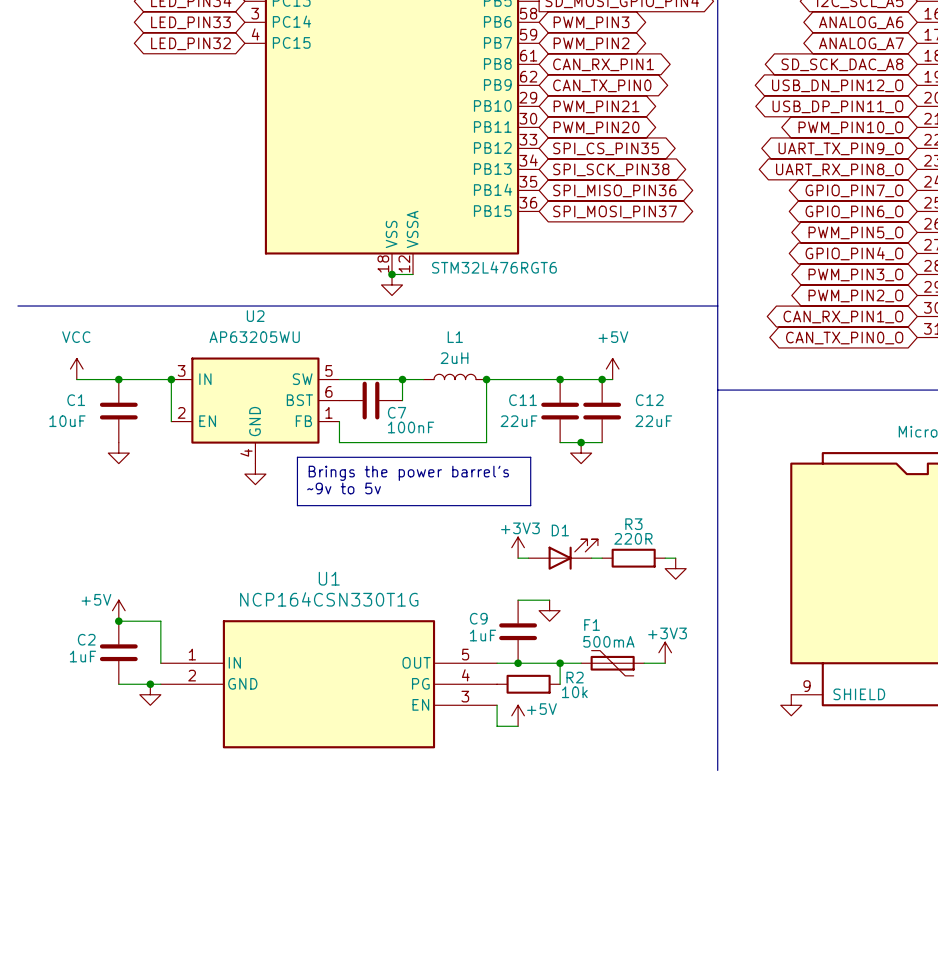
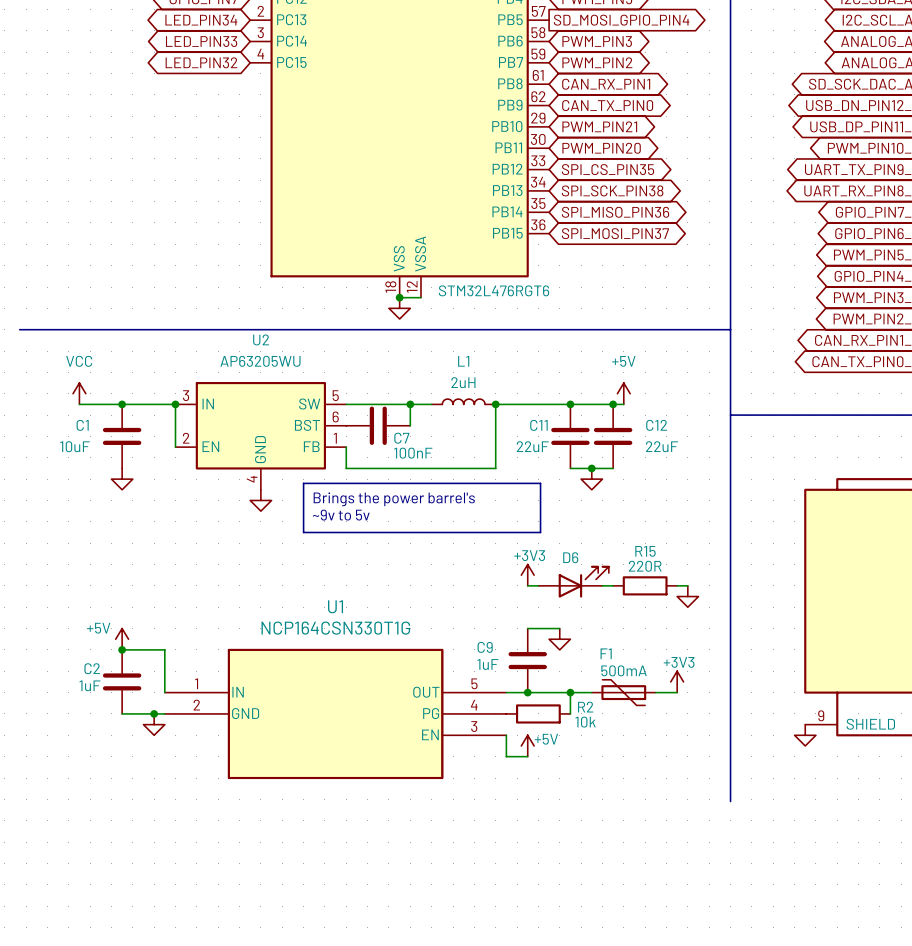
R3 name: R3 (633, 524) -> R15 (645, 551)
D1 name: D1 (560, 530) -> D6 (570, 557)

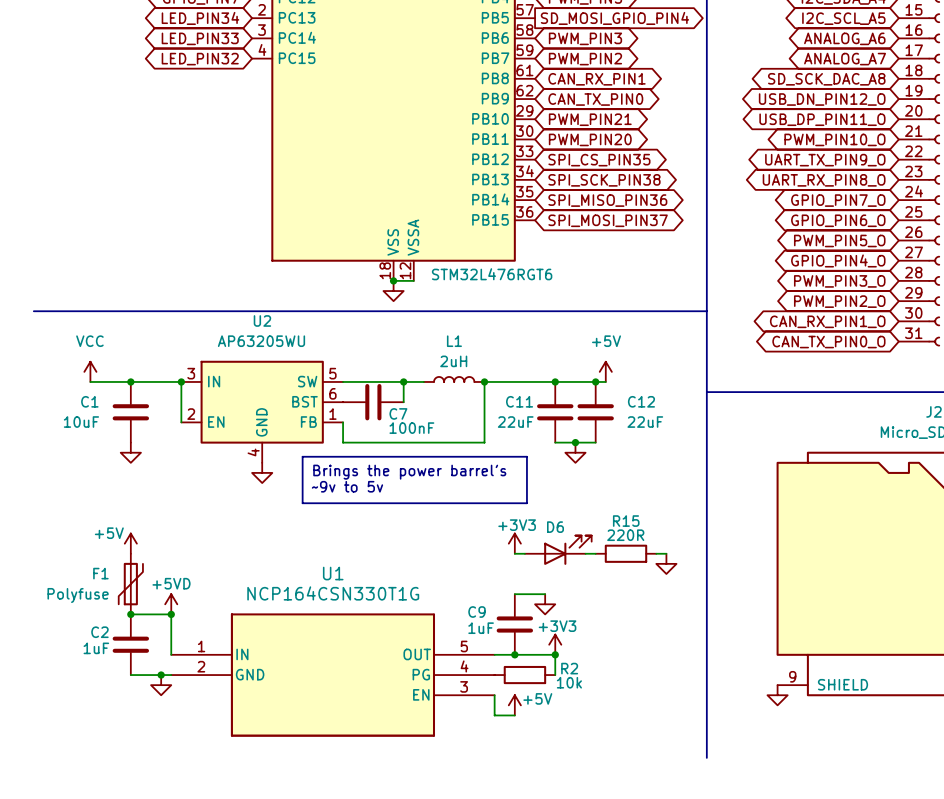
power symbol position: +5V (122, 639) -> +5V (130, 543)
power symbol: none -> +5VD (171, 604)
junction: none -> (171, 614)
F1 name position: F1 (606, 653) -> F1 (100, 573)
F1 value: 500mA (624, 670) -> Polyfuse (78, 595)
power symbol position: +3V3 (677, 681) -> +3V3 (555, 644)
wire: (570, 692) (591, 692) -> none
F1 rotation: 0° (623, 692) -> 90° clockwise (130, 584)
F1 position: (623, 692) -> (130, 584)
wire: (655, 692) (677, 692) -> none

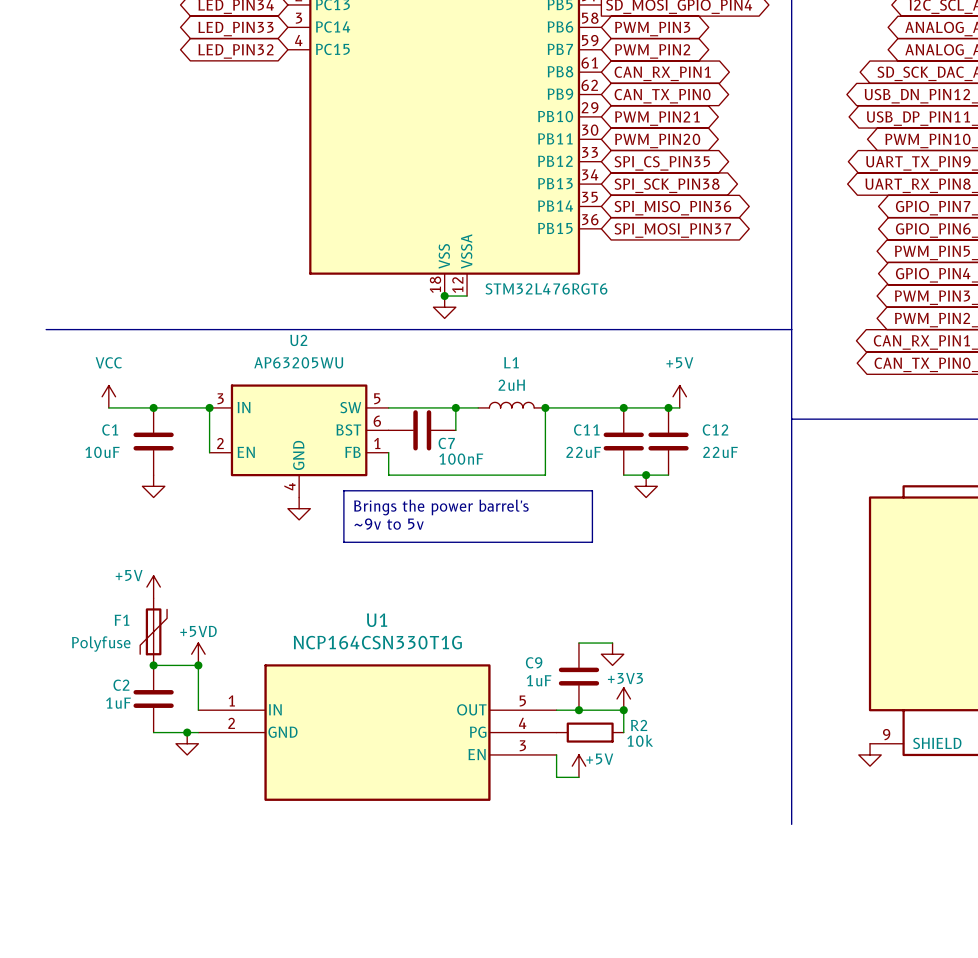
power symbol: +3V3 (514, 543) -> none
D6: (558, 550) -> none
wire: (514, 553) (524, 553) -> none
wire: (585, 553) (595, 553) -> none
R15: 220R (626, 553) -> none
wire: (656, 553) (666, 553) -> none
power symbol: (666, 563) -> none

